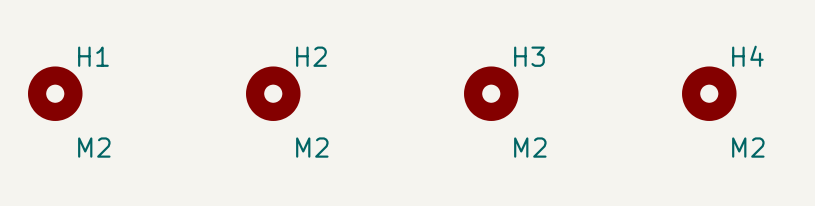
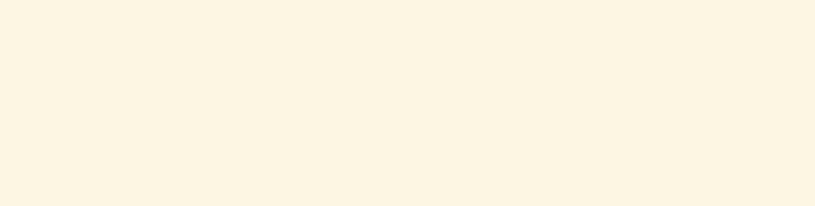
H1: M2 (55, 93) -> none
H2: M2 (273, 93) -> none
H3: M2 (491, 93) -> none
H4: M2 (709, 93) -> none

